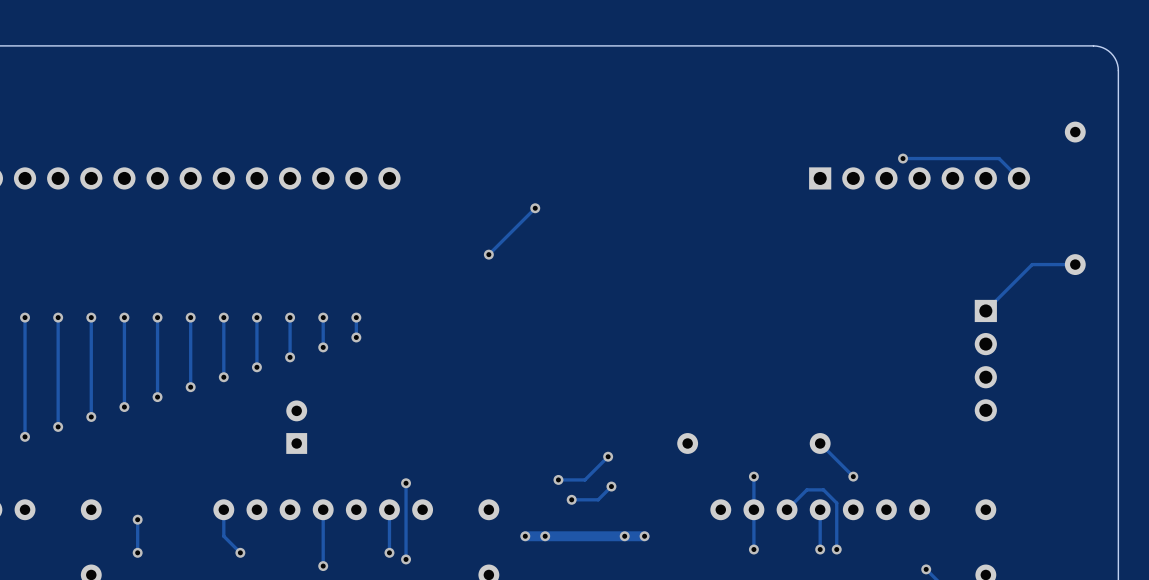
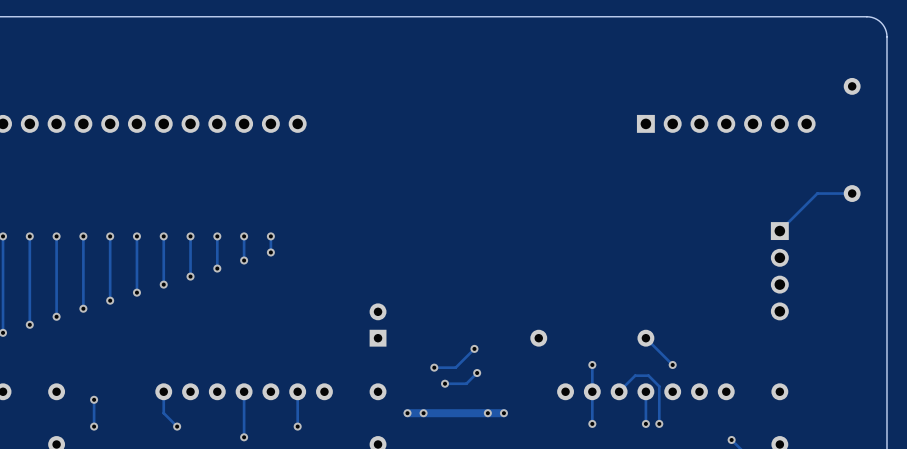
track: (903, 158) (999, 158) (1018, 178) -> none
via: (903, 158) -> none
track: (535, 208) (488, 254) -> none
via: (535, 208) -> none
via: (488, 254) -> none
part position: (296, 427) -> (378, 325)
track: (406, 483) (406, 559) -> none
via: (406, 483) -> none
via: (406, 559) -> none

